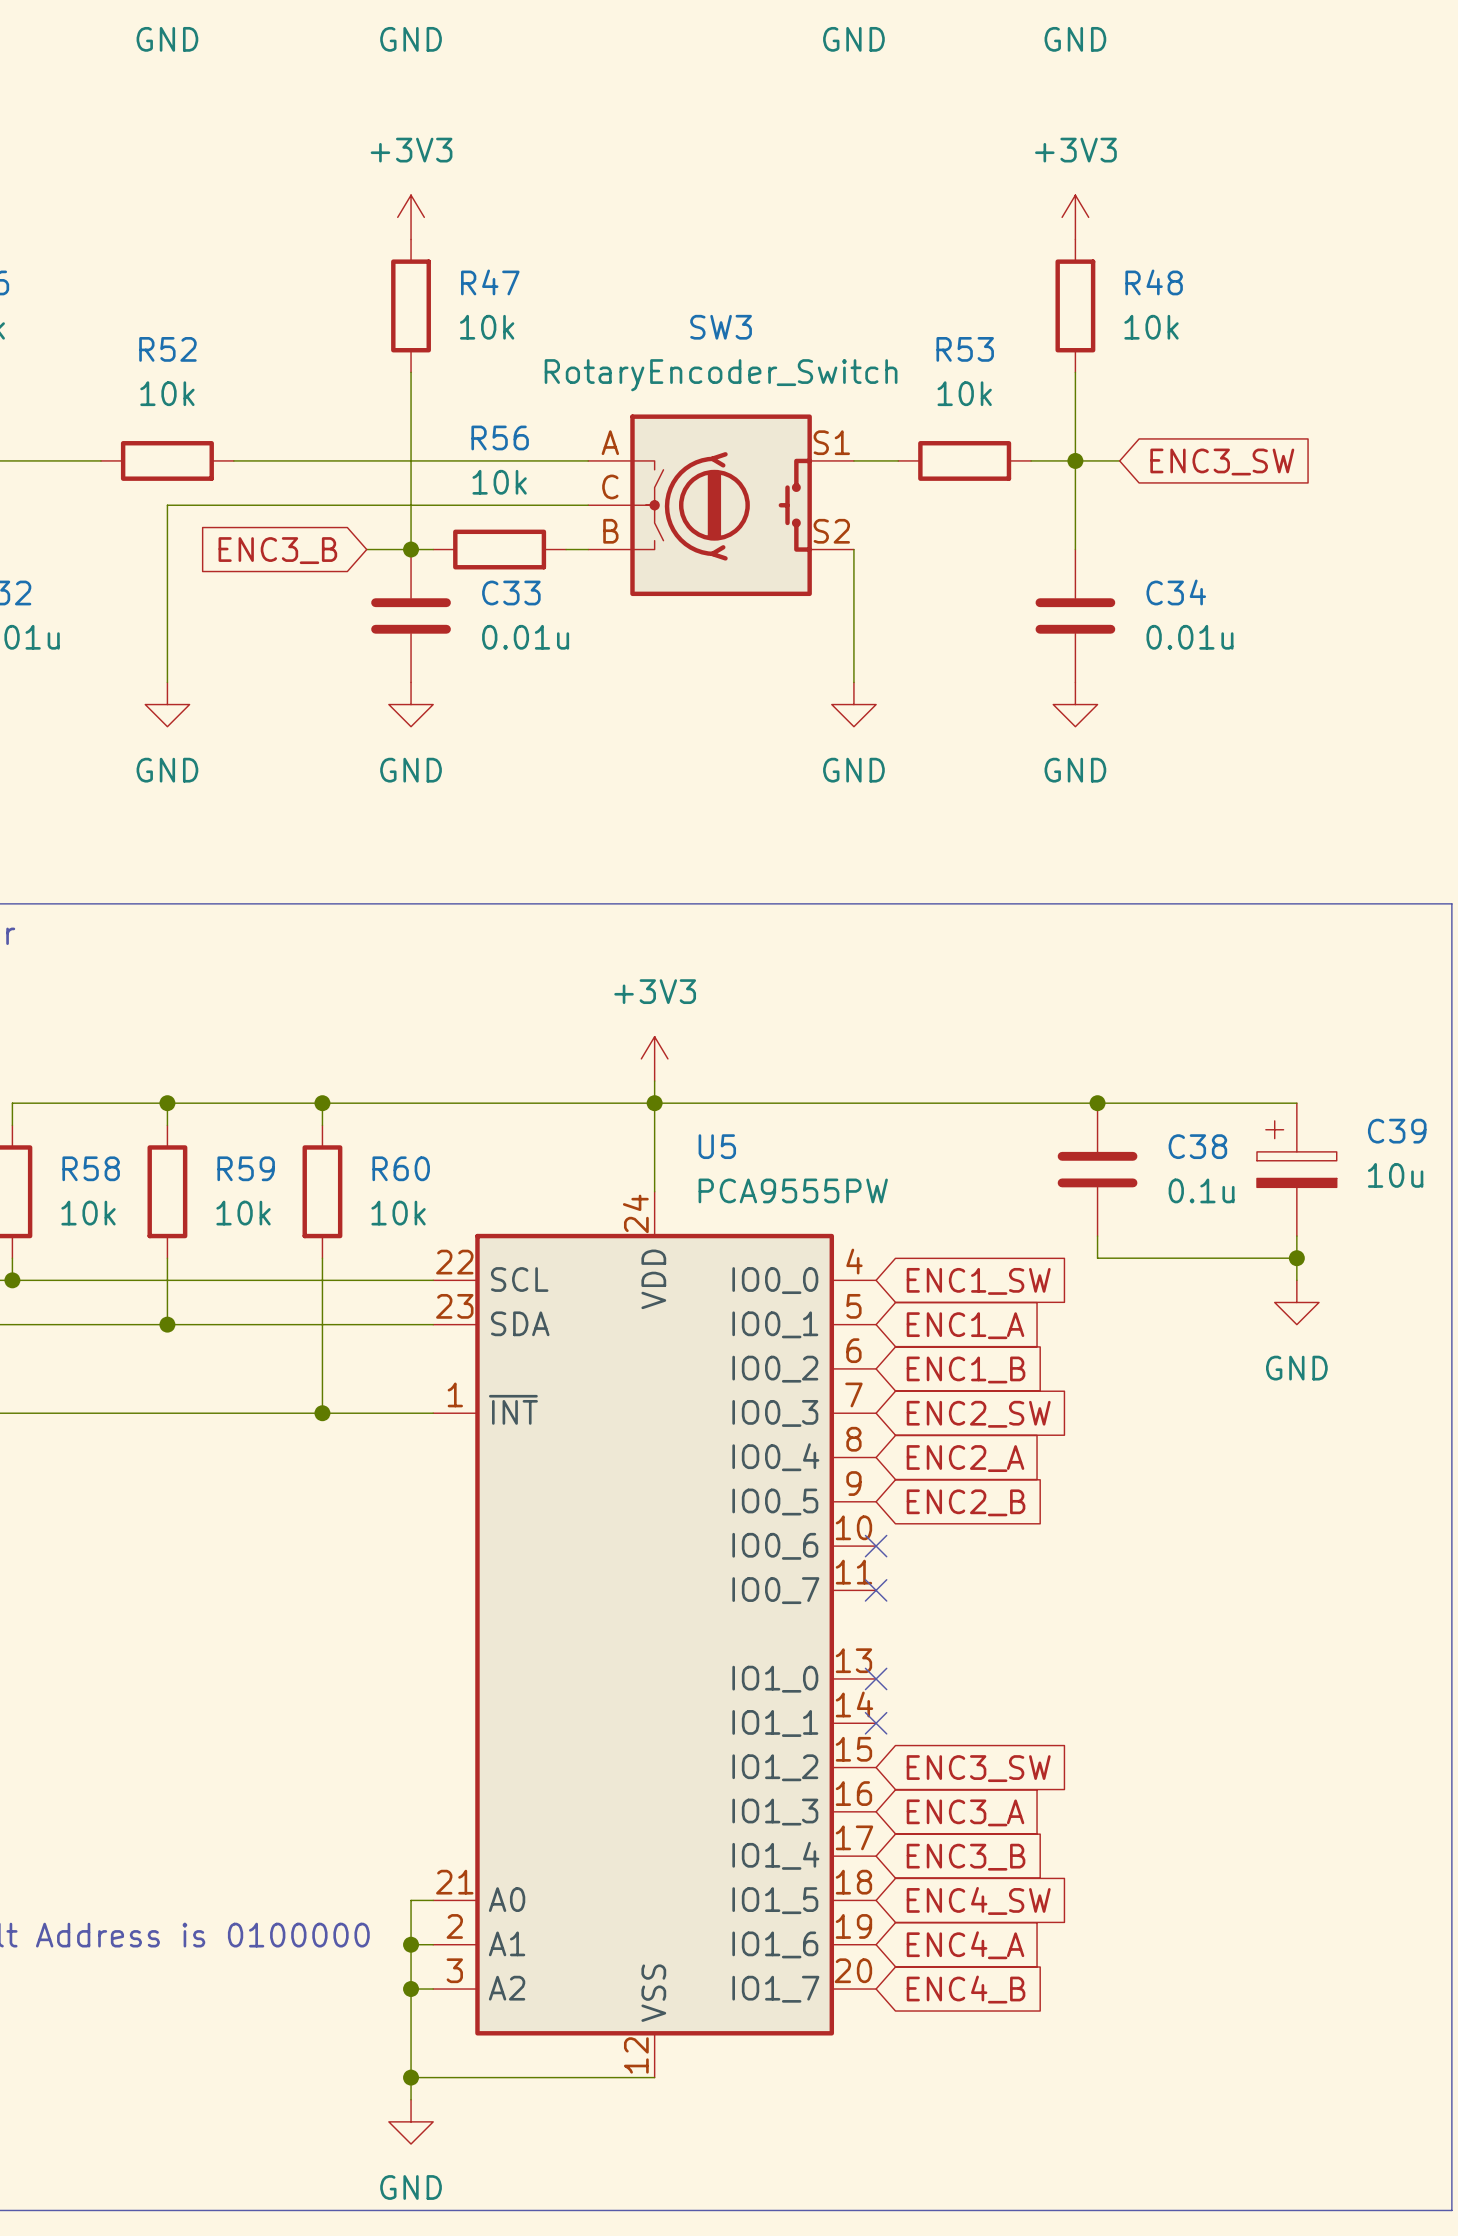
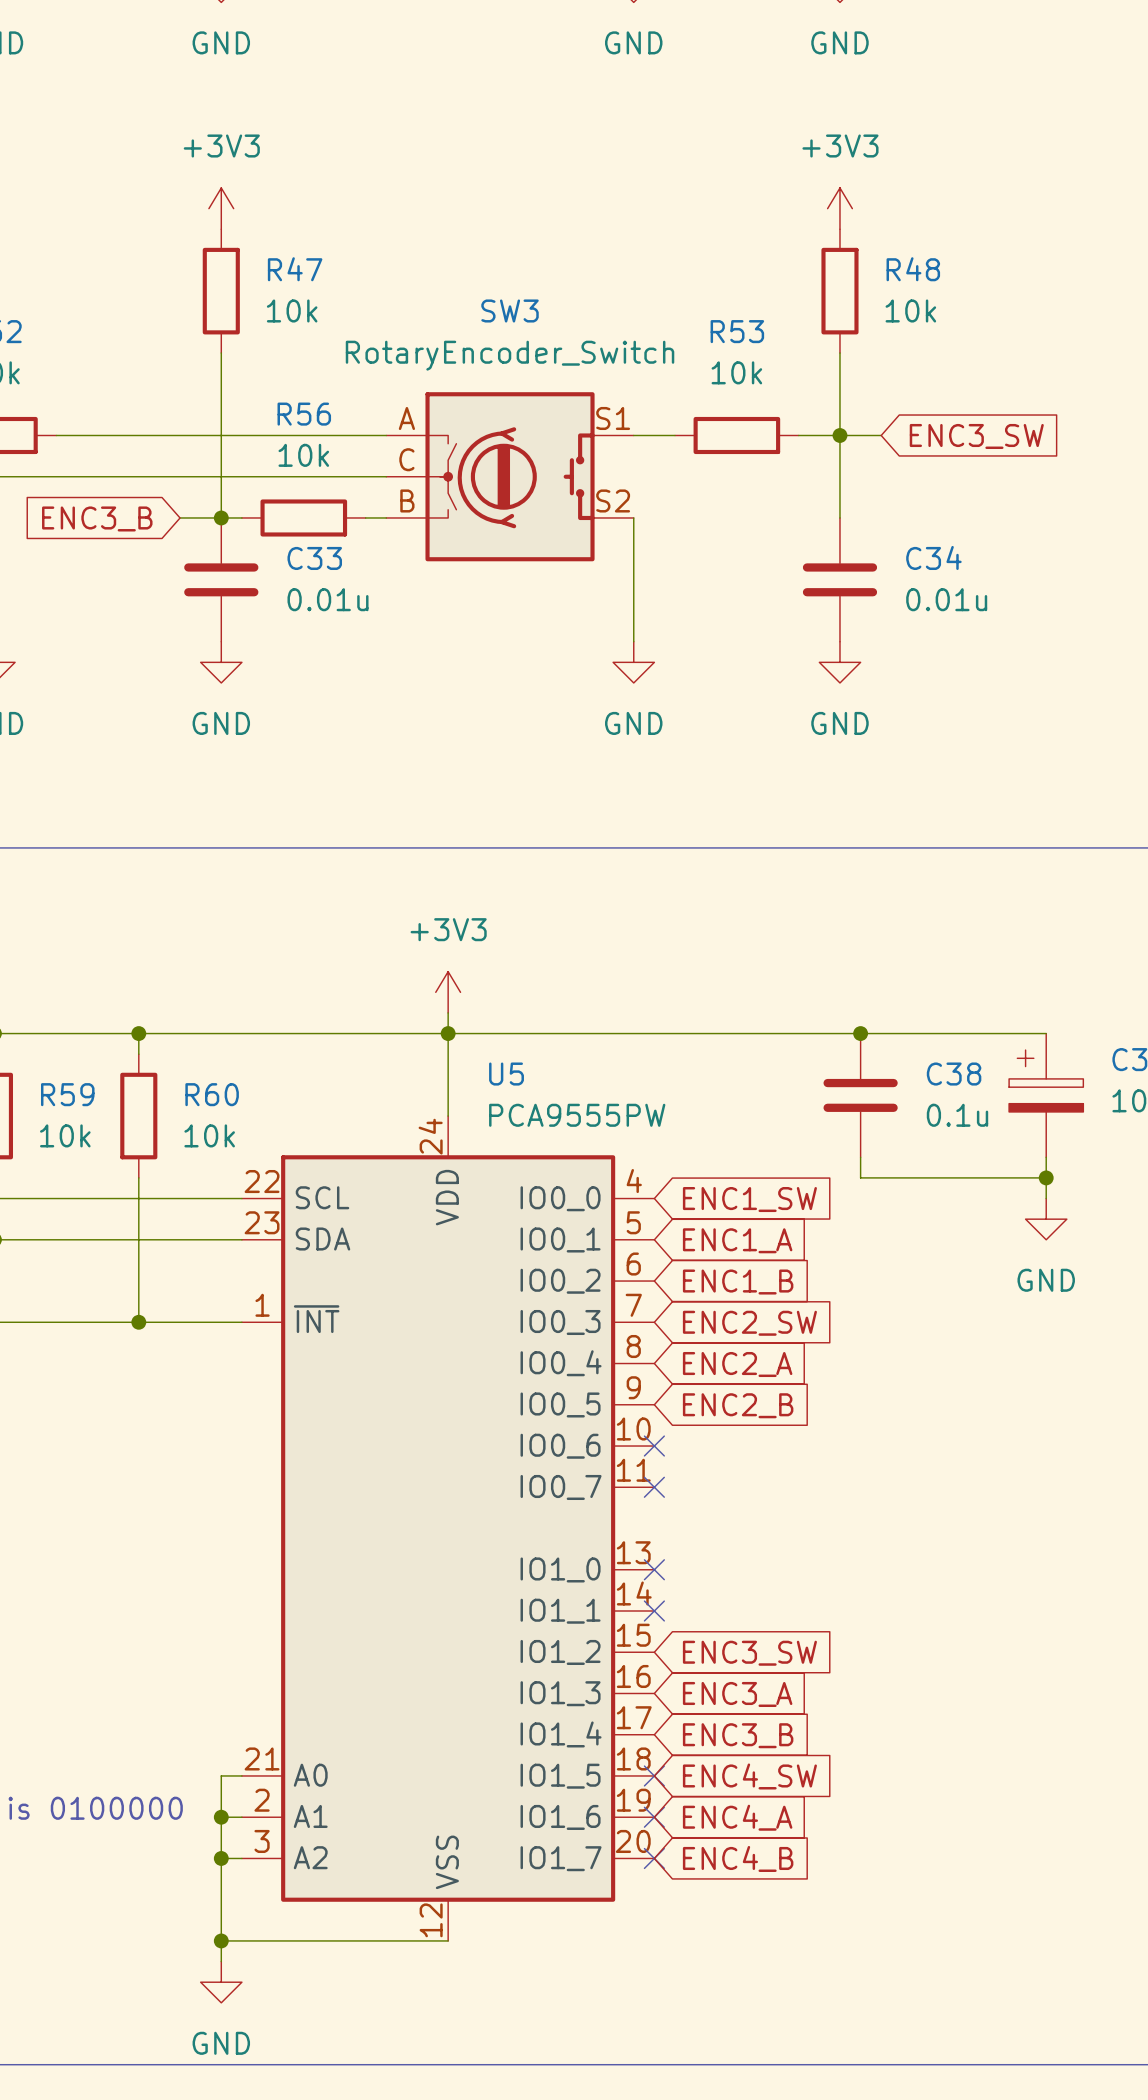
no-connect mark: none -> (654, 1775)
no-connect mark: none -> (654, 1817)
no-connect mark: none -> (654, 1858)

